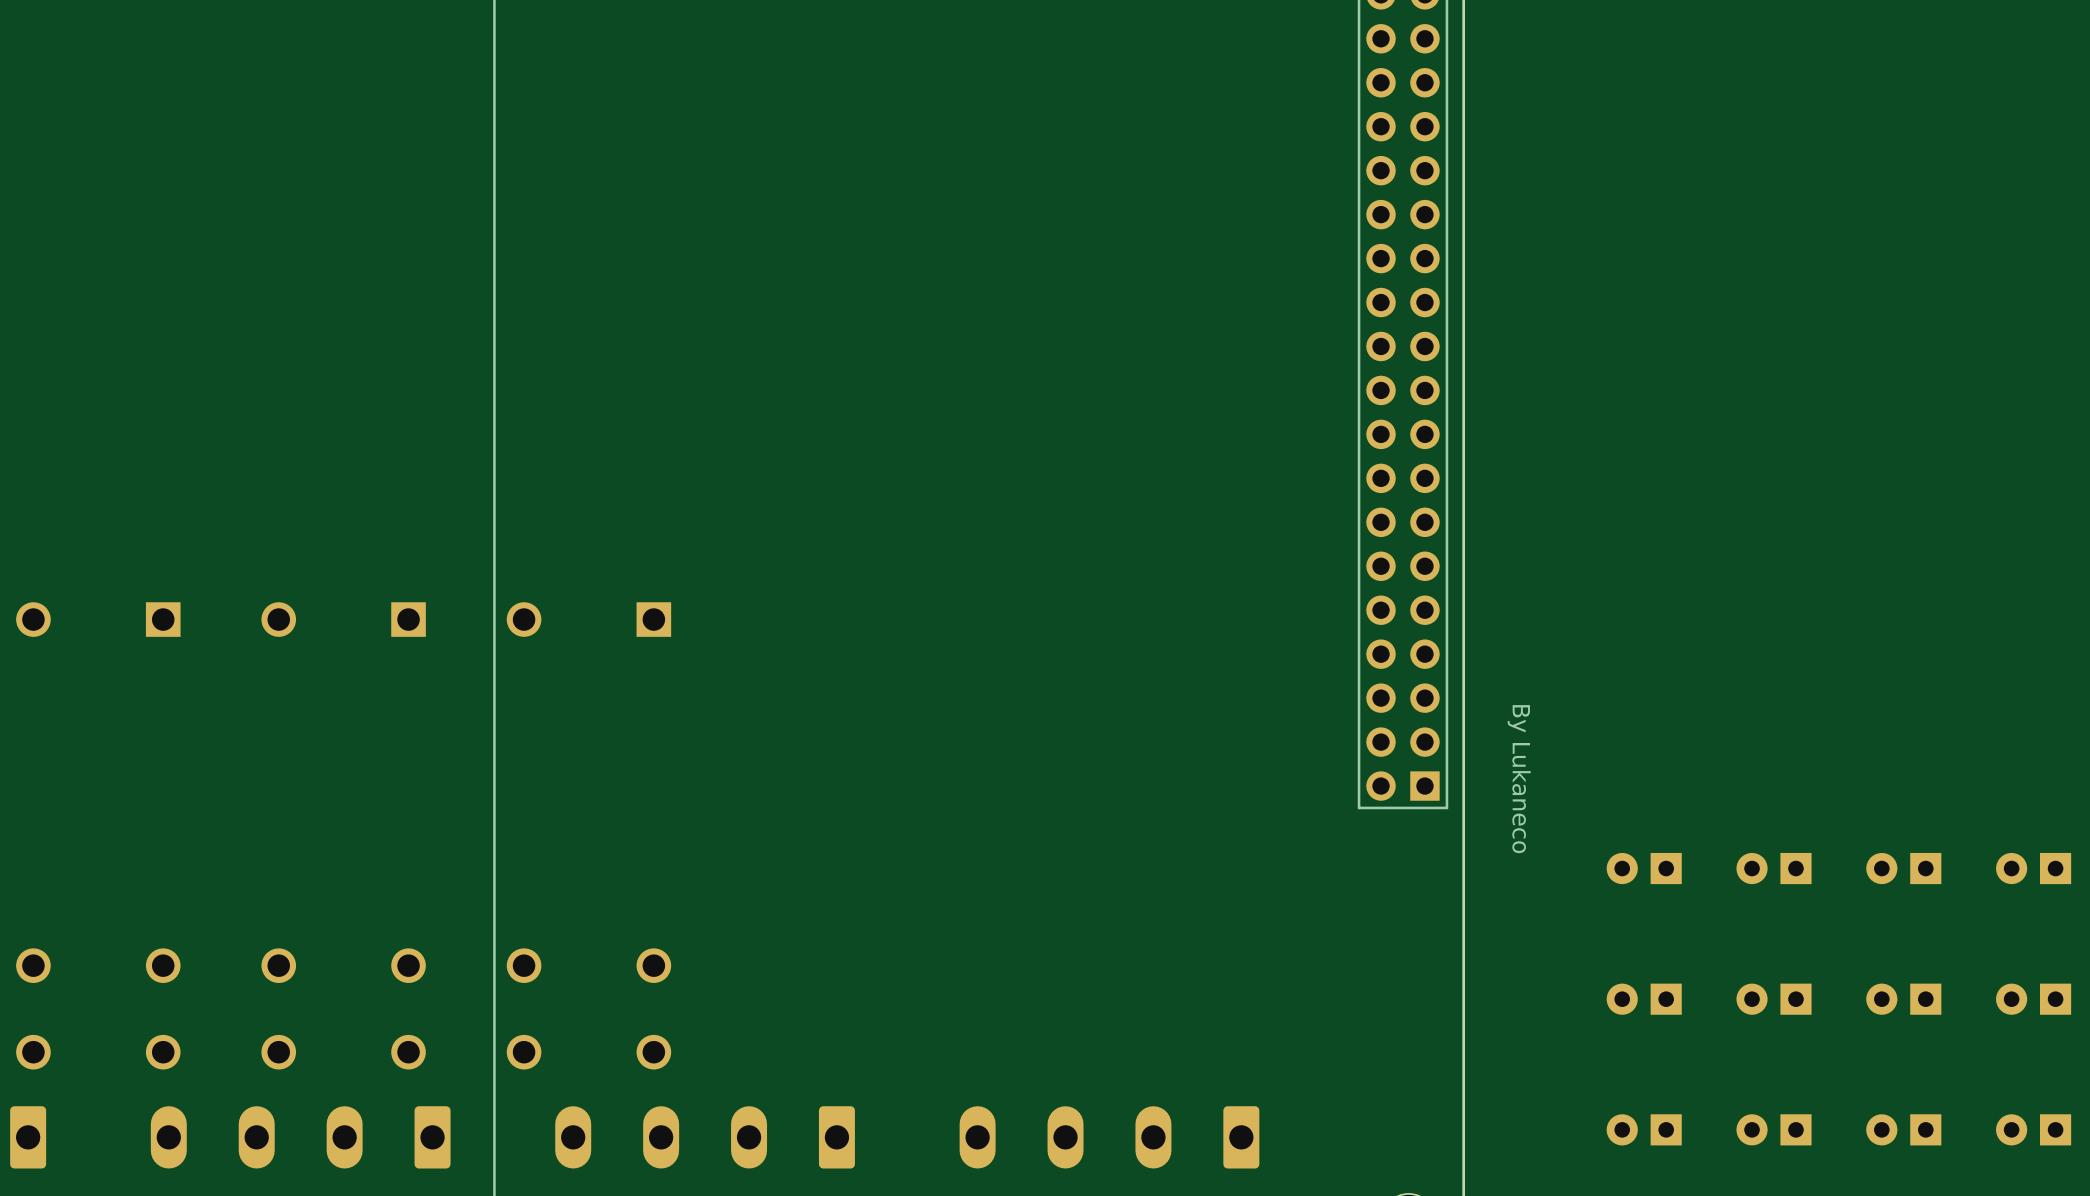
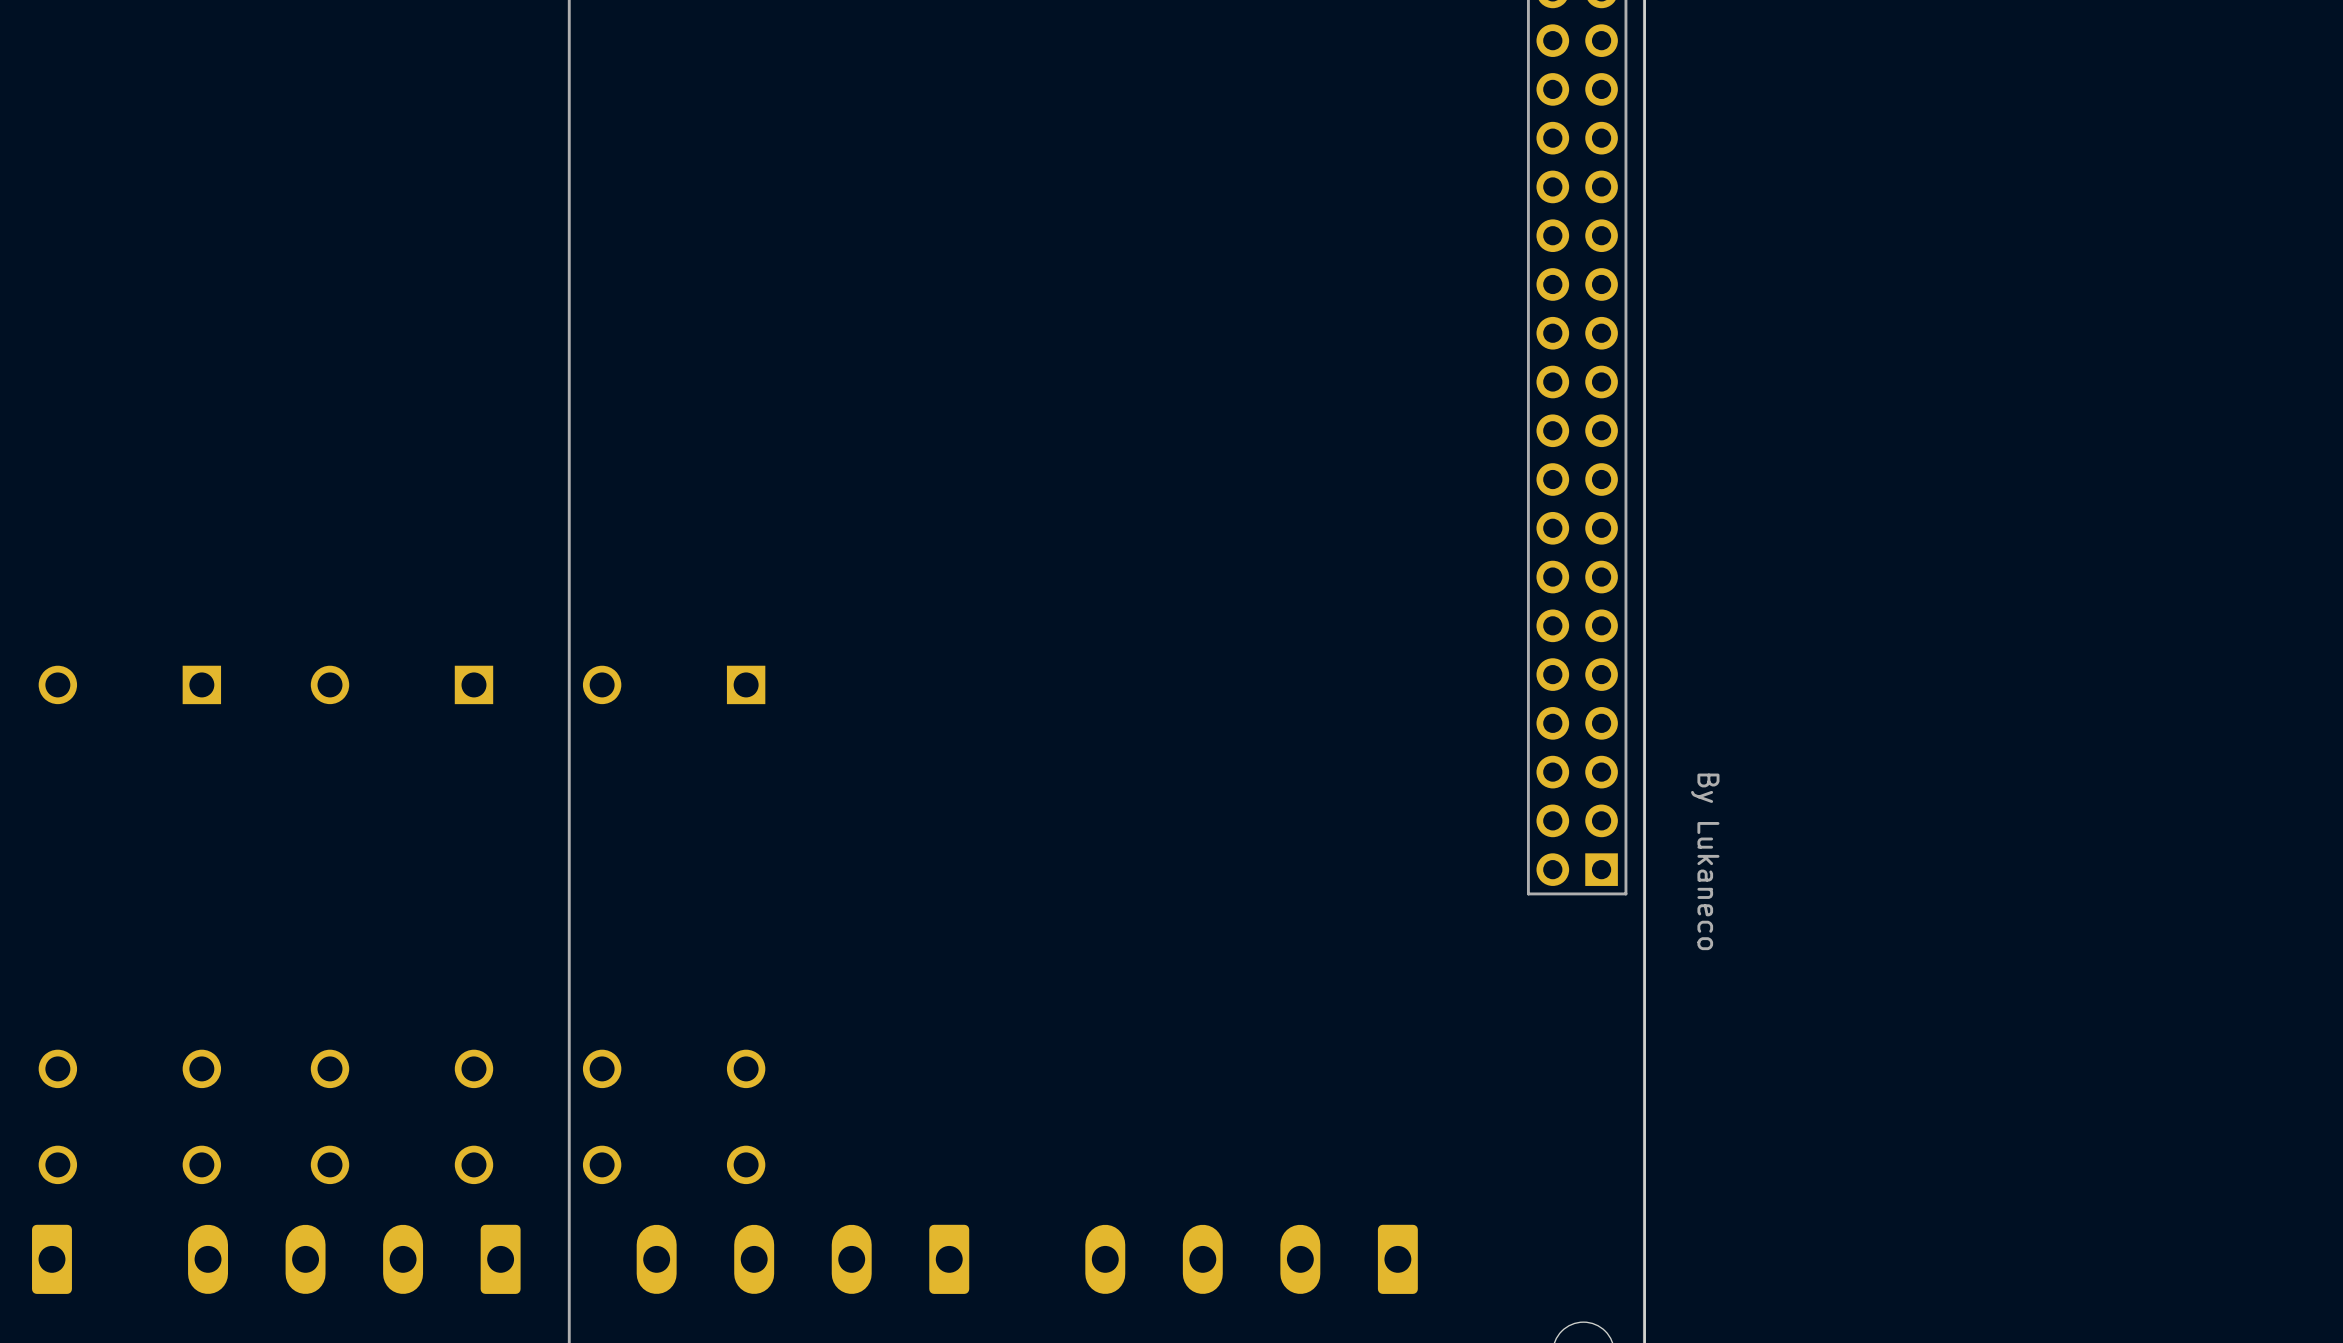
part: (1644, 868) -> none
part: (1774, 868) -> none
part: (1903, 868) -> none
part: (2033, 868) -> none
part: (1644, 999) -> none
part: (1774, 999) -> none
part: (1903, 999) -> none
part: (2033, 999) -> none
part: (1644, 1129) -> none
part: (1774, 1129) -> none
part: (1903, 1129) -> none
part: (2033, 1129) -> none

